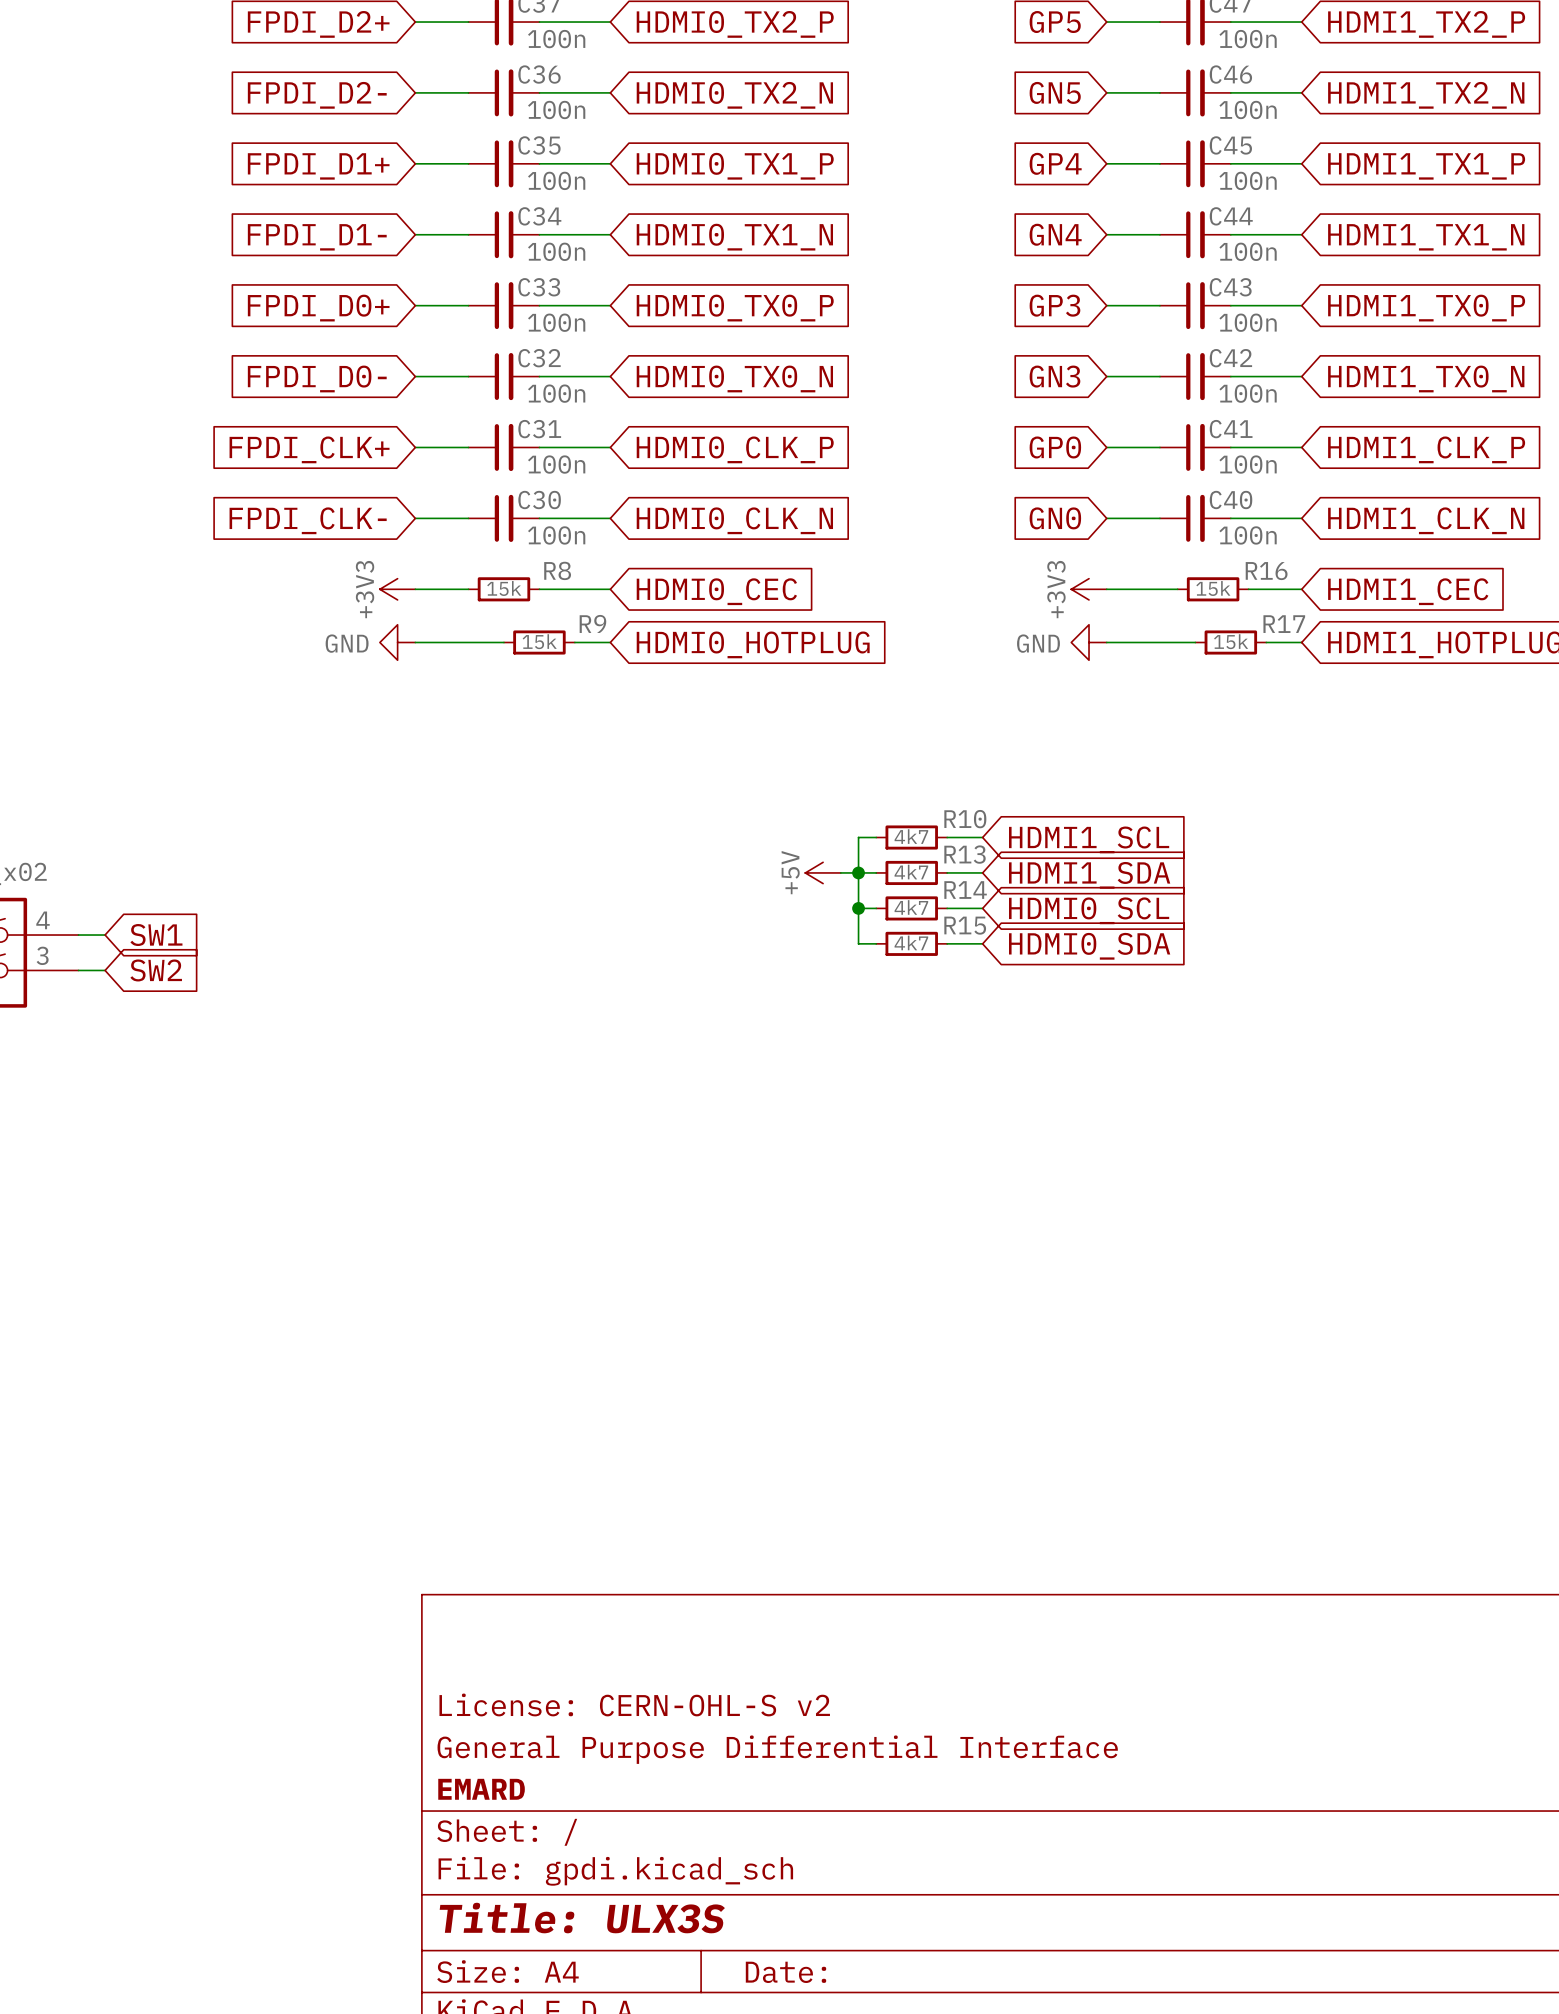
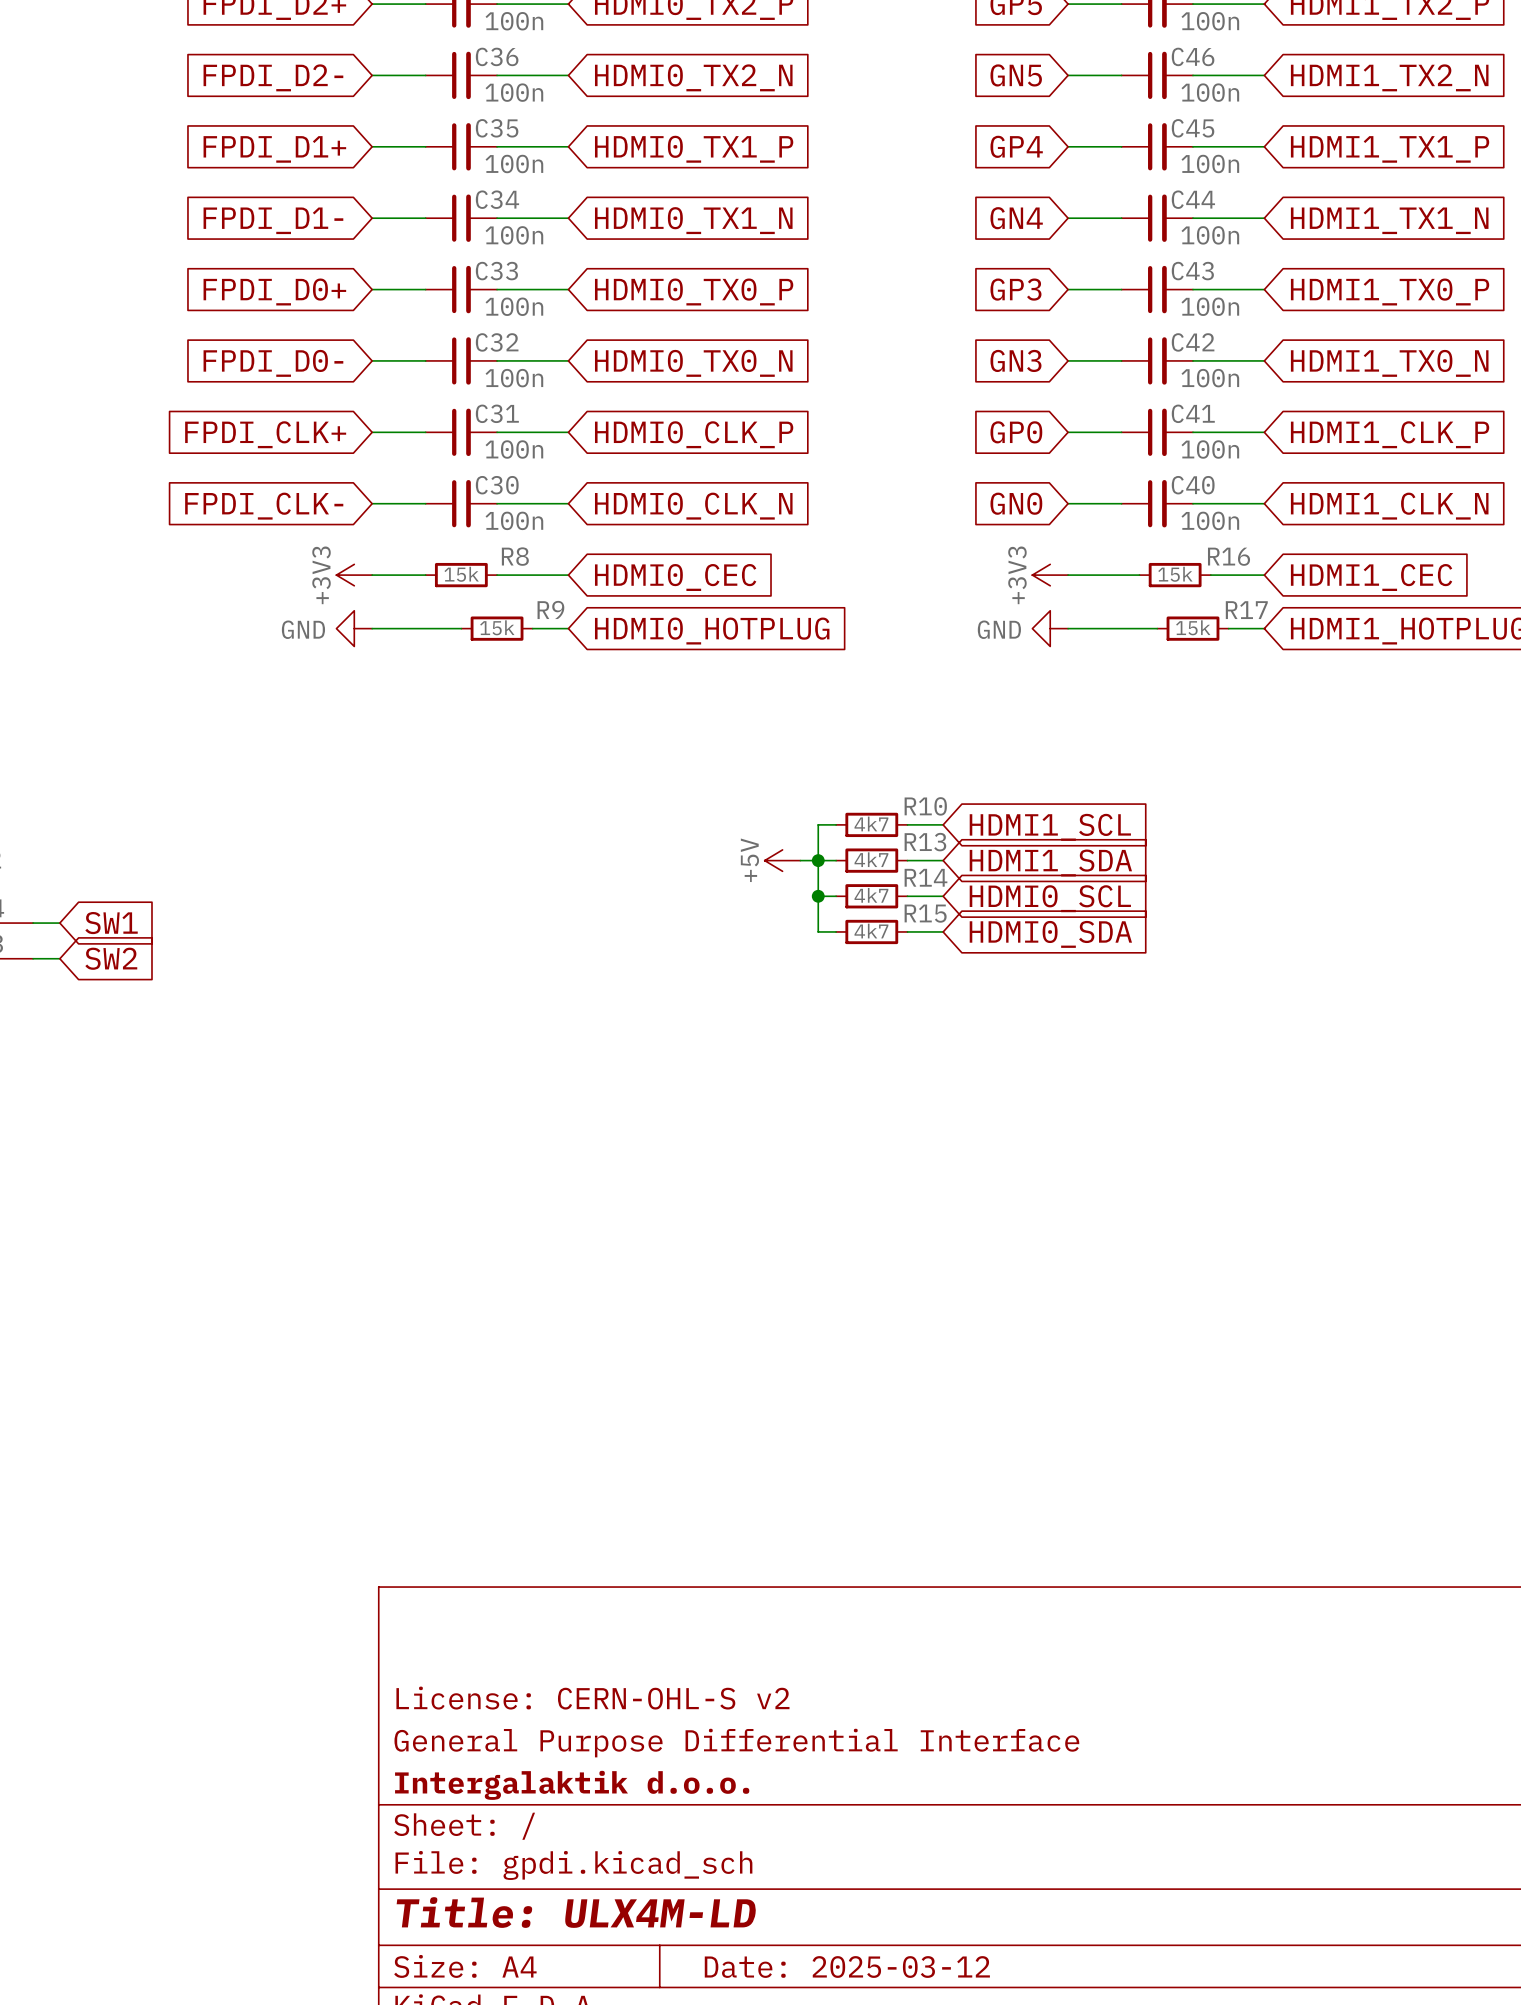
title block: EMARD (481, 1789) -> Intergalaktik d.o.o. (572, 1785)
title block: Title: ULX3S (582, 1918) -> Title: ULX4M-LD (576, 1912)
title block: Date: (785, 1972) -> Date: 2025-03-12 (847, 1967)

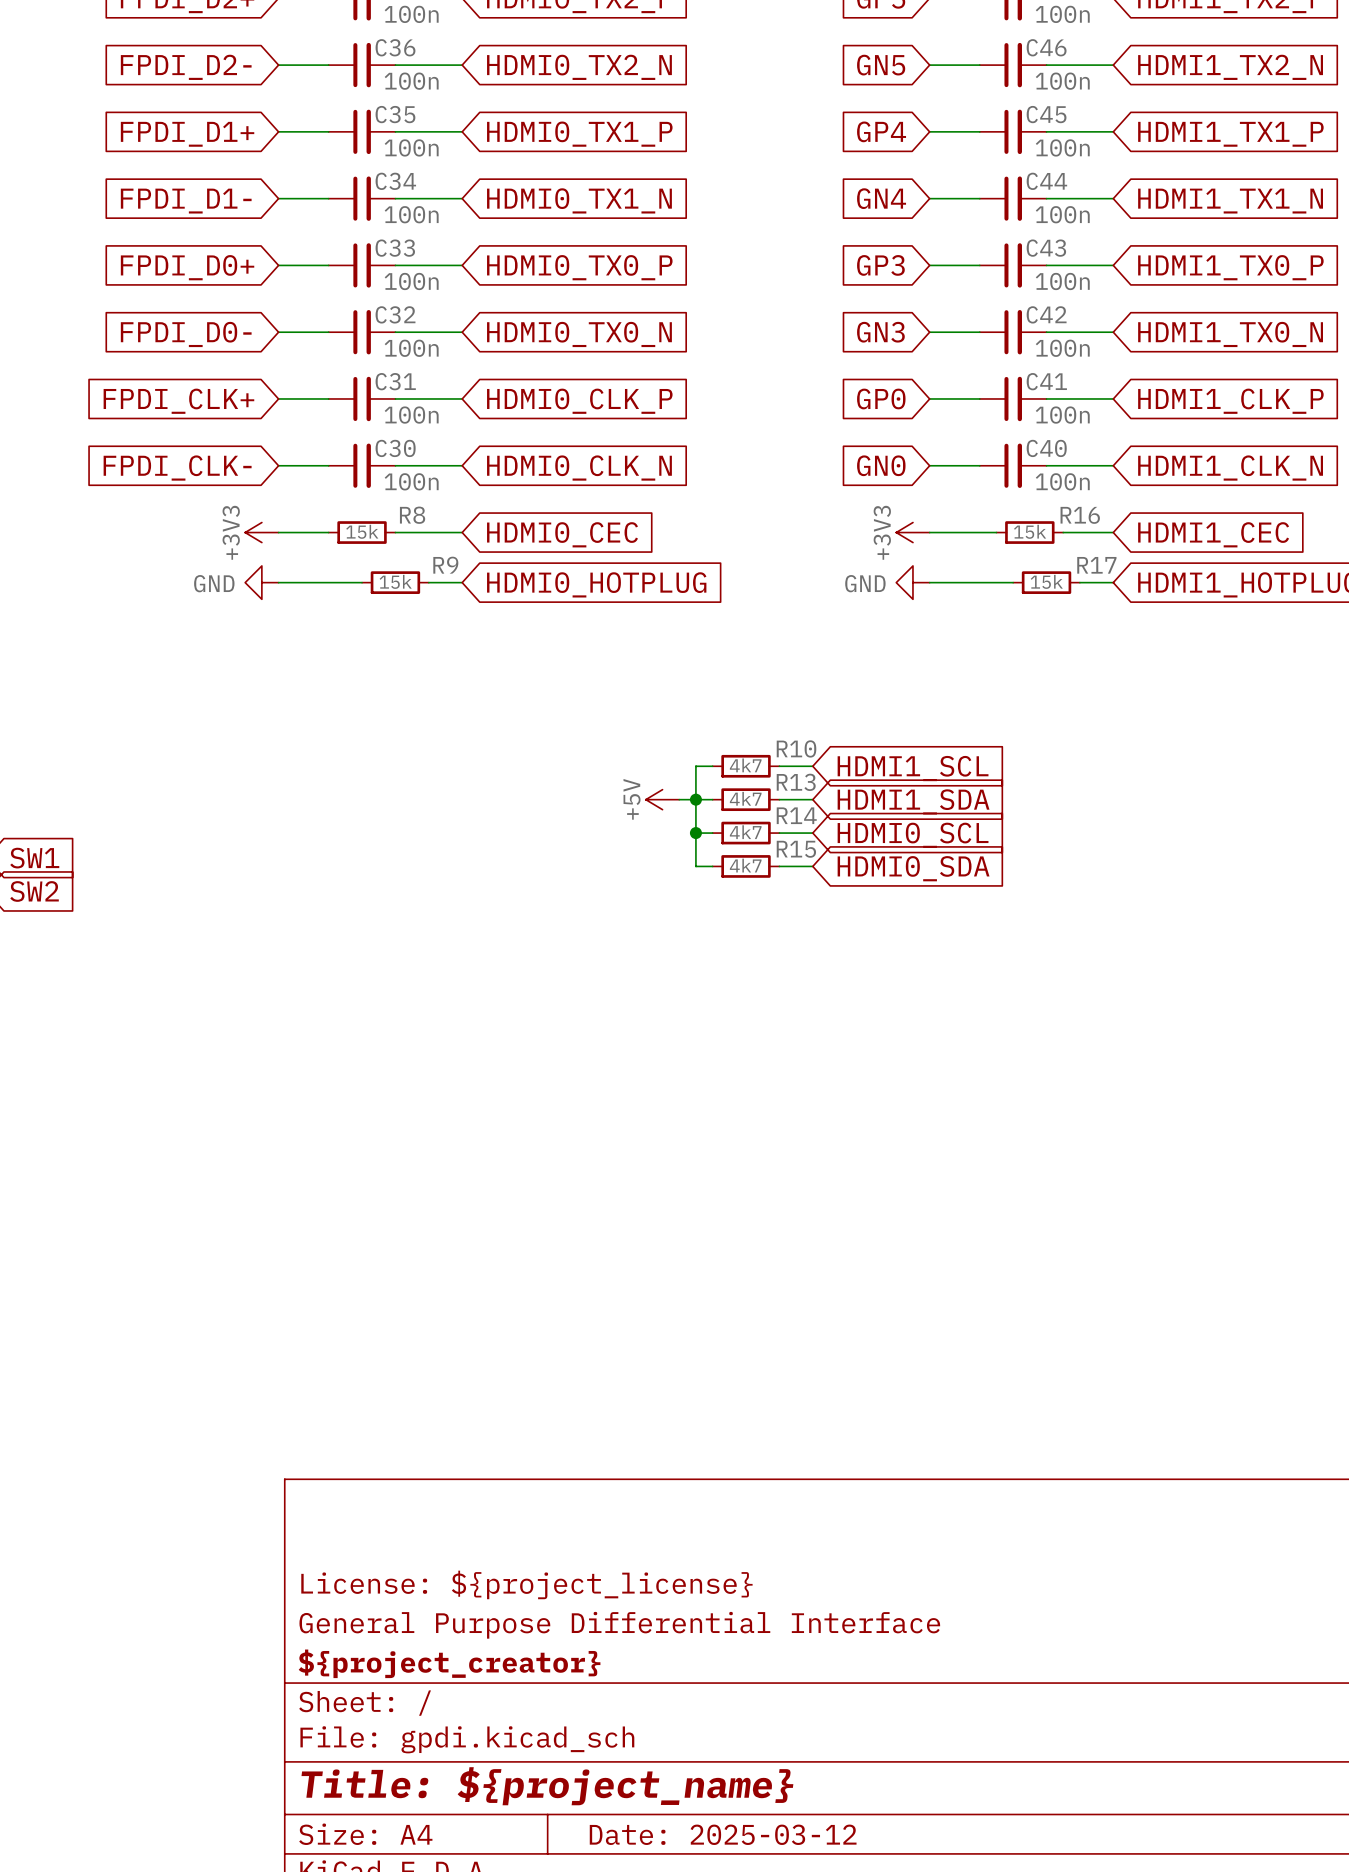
title block: License: CERN-OHL-S v2 (592, 1698) -> License: ${project_license} (526, 1584)
title block: Intergalaktik d.o.o. (572, 1785) -> ${project_creator} (449, 1663)
title block: Title: ULX4M-LD (576, 1912) -> Title: ${project_name} (547, 1786)

